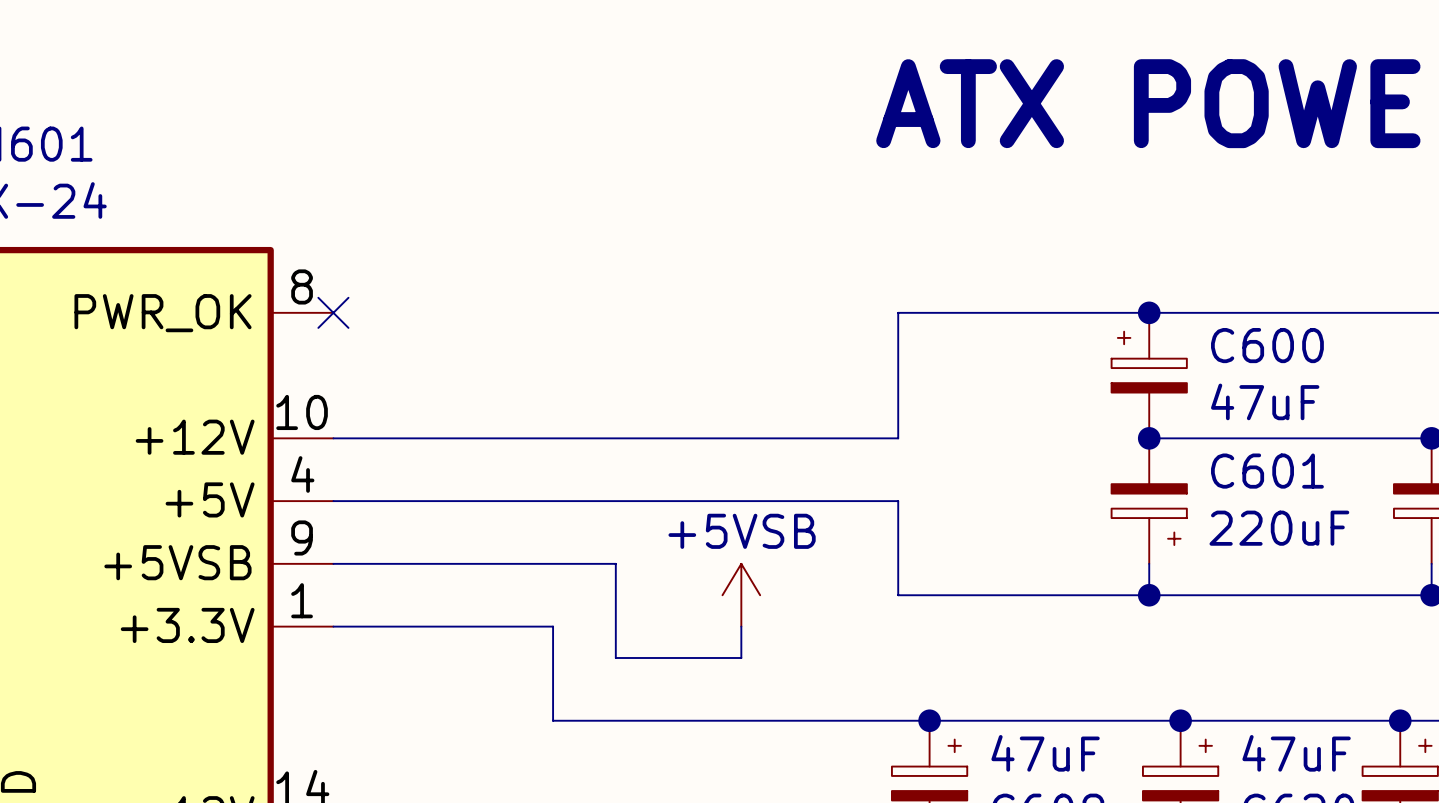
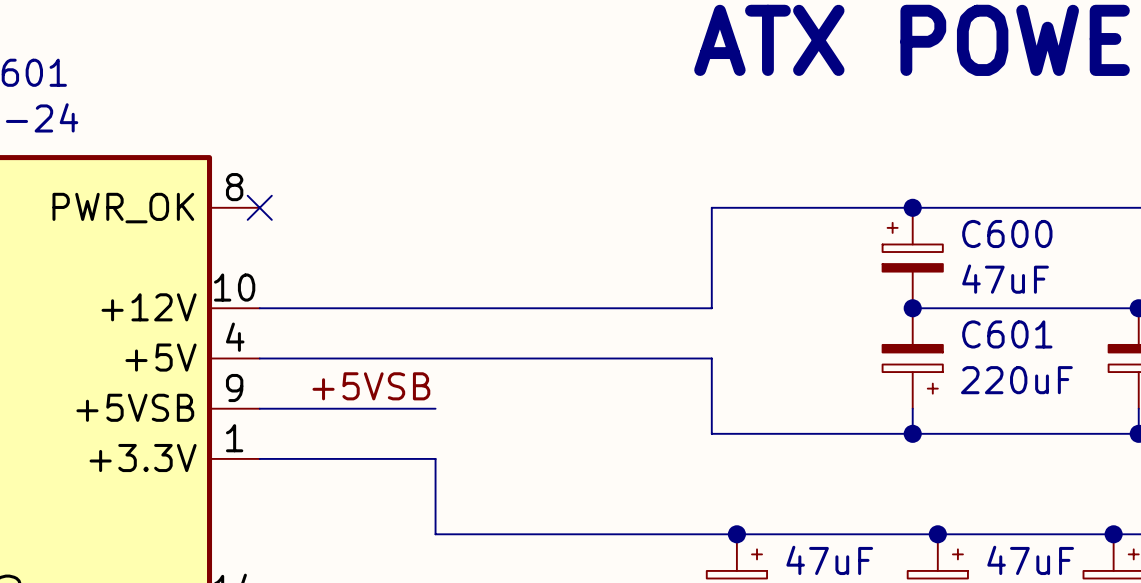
label: none -> +5VSB (371, 386)
wire: (553, 563) (615, 563) (615, 657) (741, 657) (741, 626) -> none
power symbol: +5VSB (741, 595) -> none

